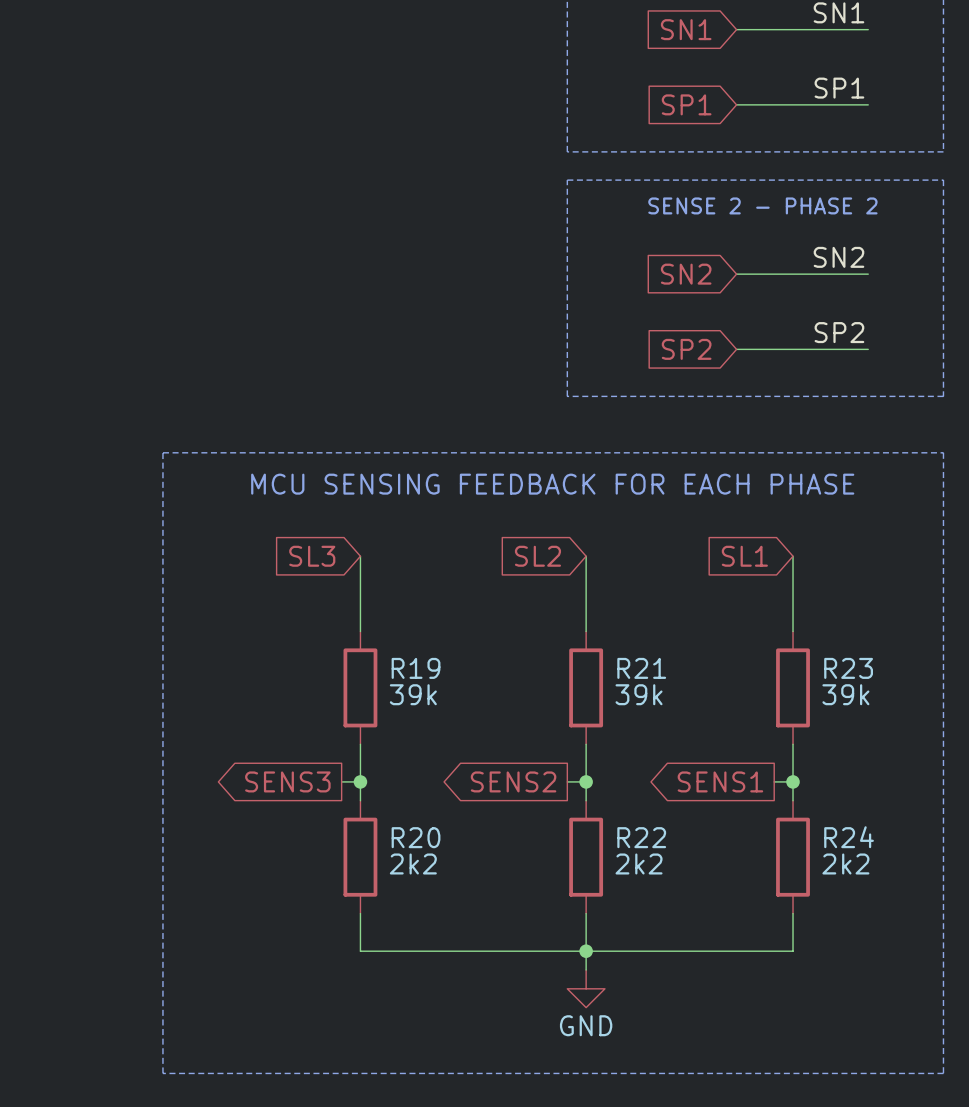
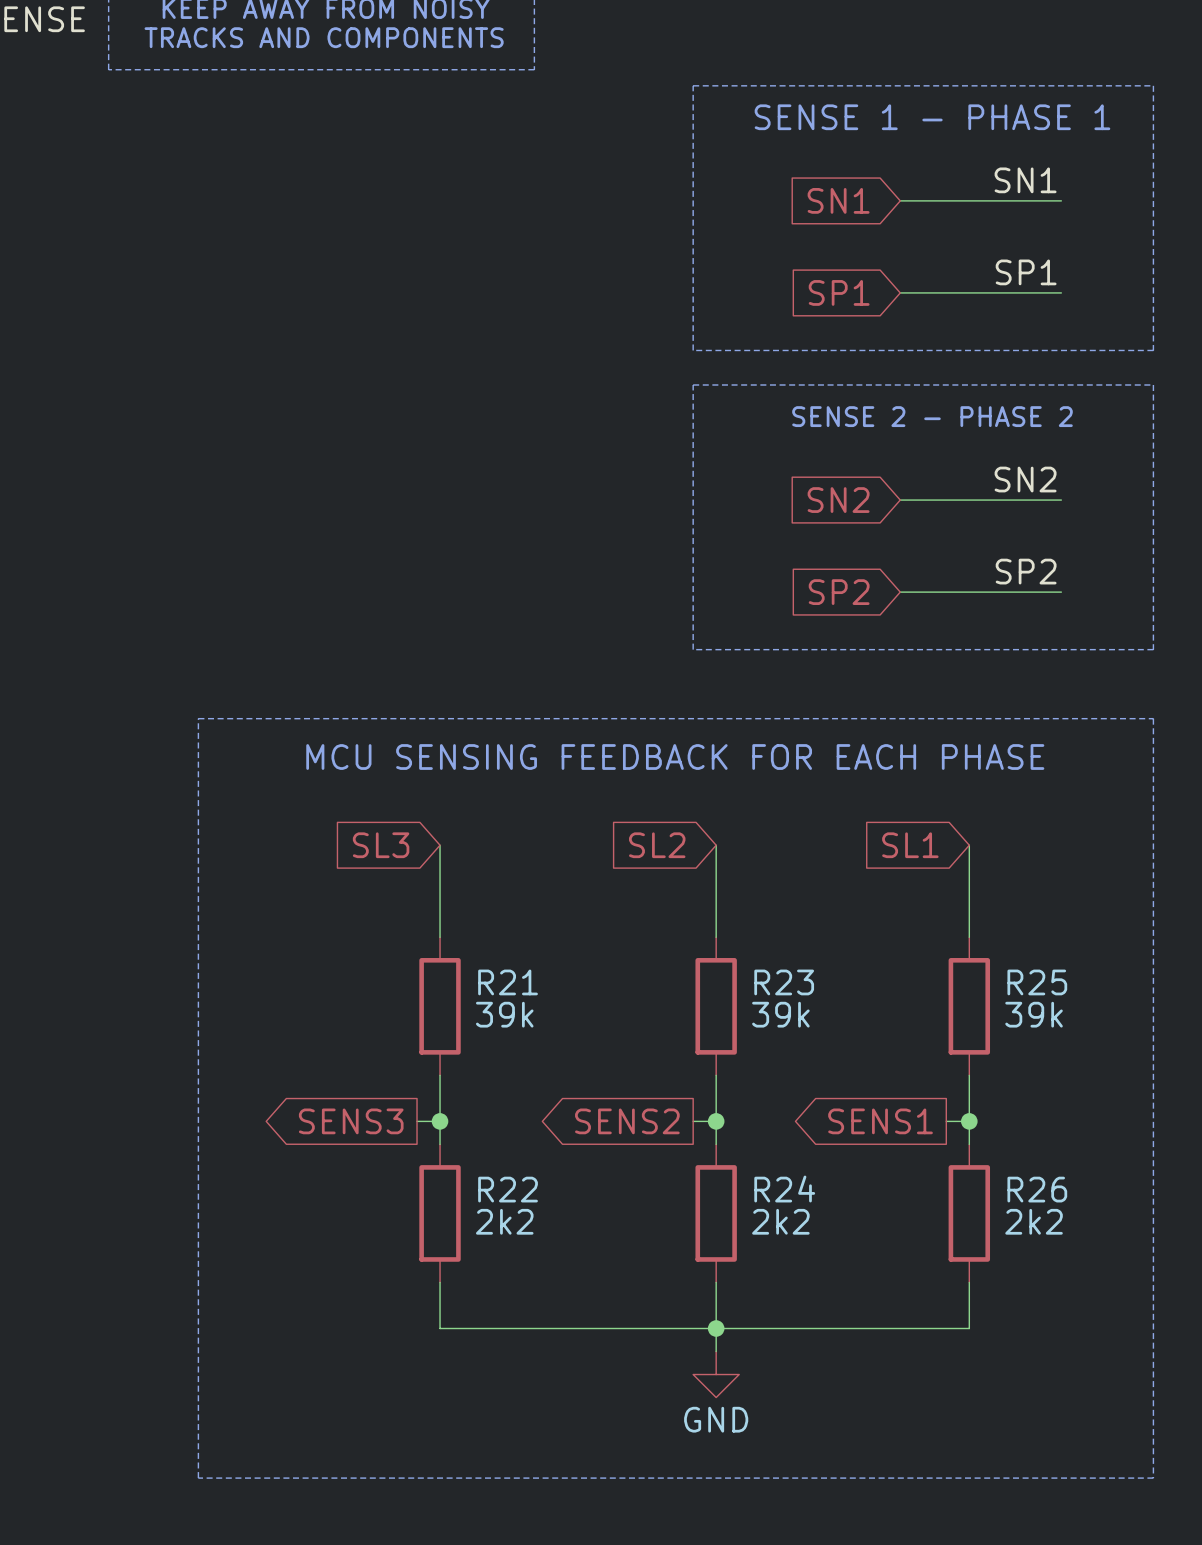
R19 name: R19 (416, 668) -> R21 (508, 982)
R21 name: R21 (641, 668) -> R23 (784, 982)
R23 name: R23 (848, 668) -> R25 (1037, 982)
R20 name: R20 (416, 837) -> R22 (508, 1189)
R22 name: R22 (641, 837) -> R24 (784, 1189)
R24 name: R24 (849, 837) -> R26 (1037, 1189)

